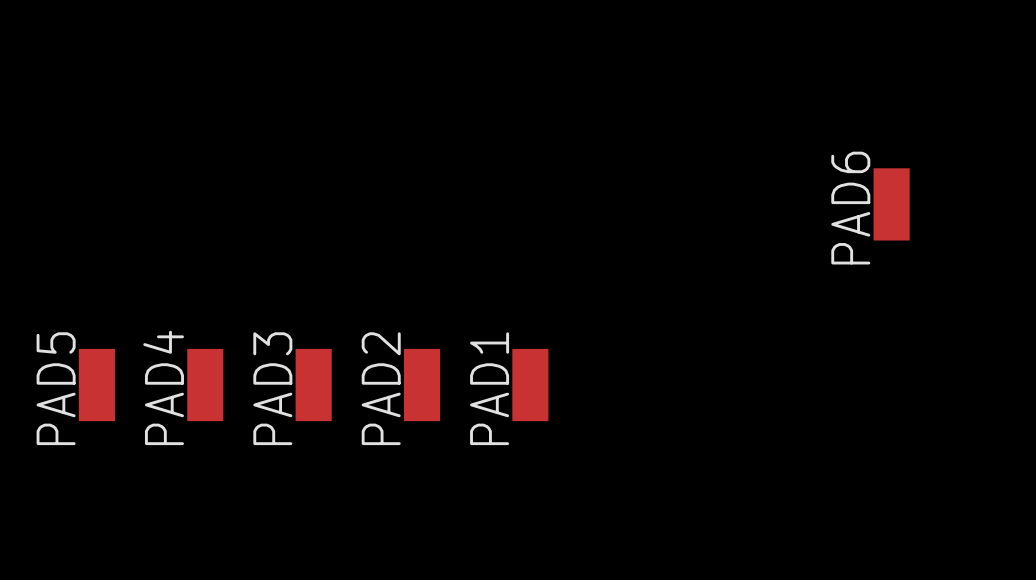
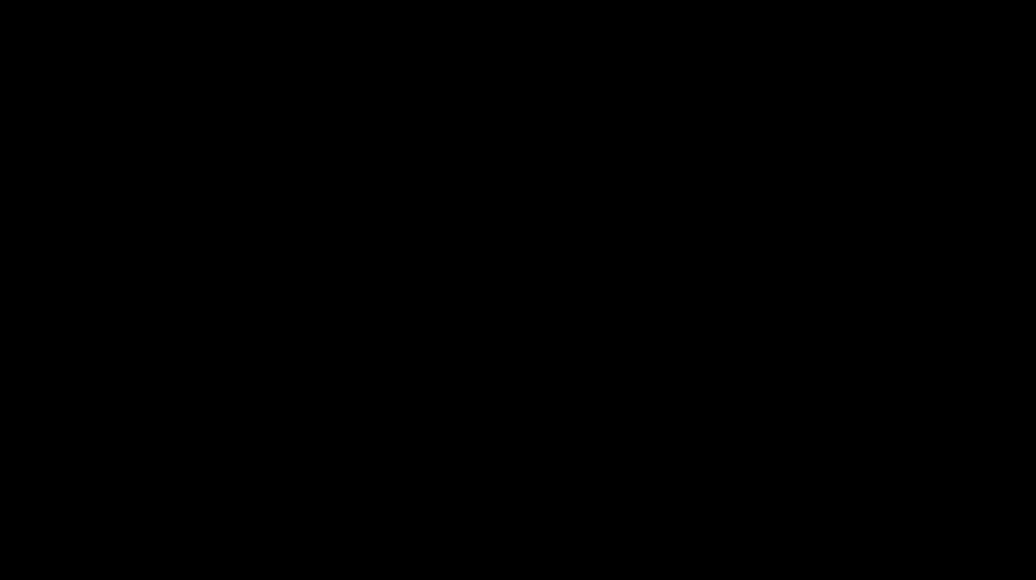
PAD6: (891, 204) -> none
PAD5: (96, 385) -> none
PAD4: (205, 385) -> none
PAD3: (313, 385) -> none
PAD2: (422, 385) -> none
PAD1: (530, 385) -> none

